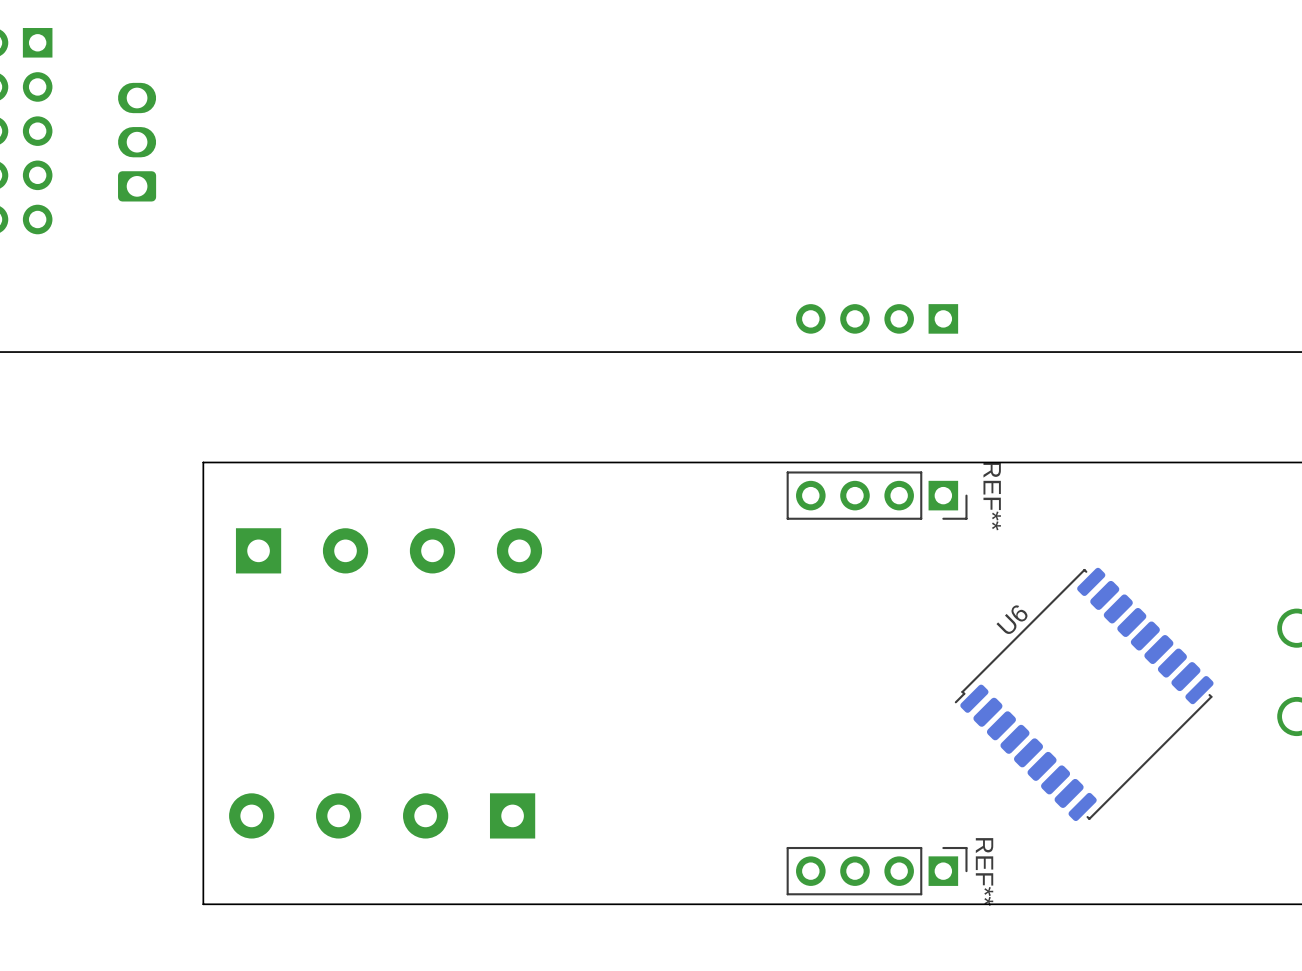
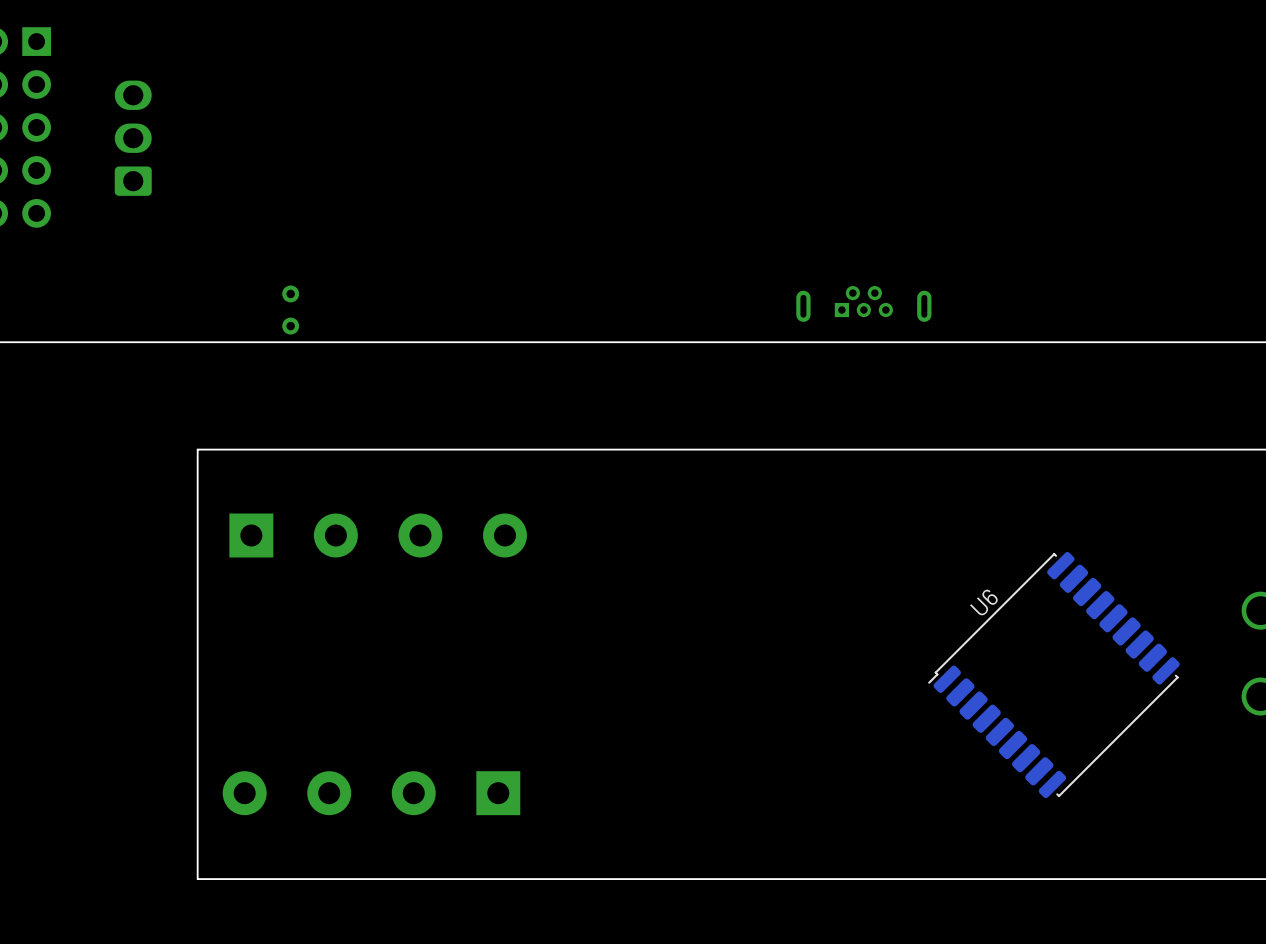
part footprint: [796, 304, 959, 334] -> [796, 286, 932, 322]
part: none -> (290, 310)
REF**: (877, 495) -> none
REF**: (877, 871) -> none

